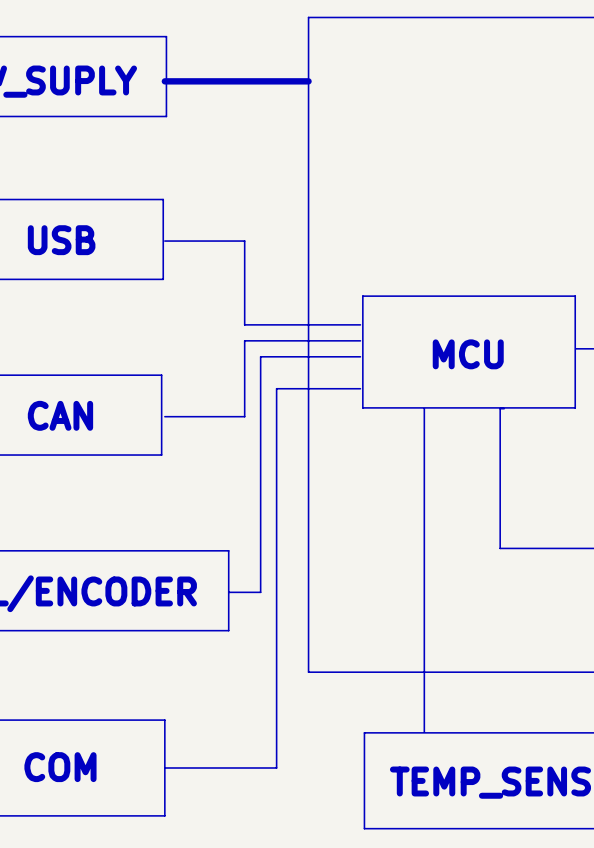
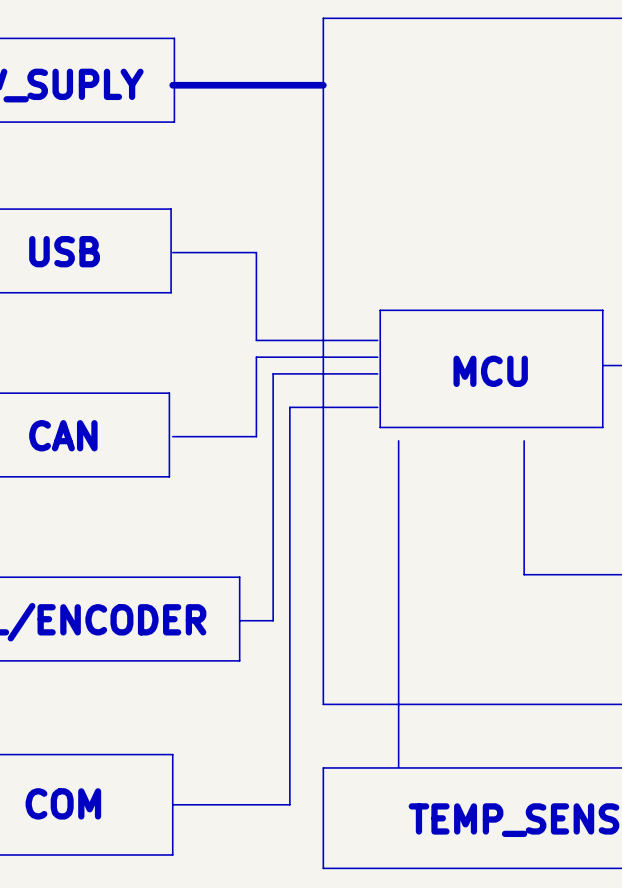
line: (424, 408) (424, 732) -> none
line: (504, 408) (500, 408) (500, 420) -> none
line: none -> (398, 440) (398, 767)
line: (364, 732) (364, 828) -> (381, 767) (323, 767) (323, 868) (381, 868)

